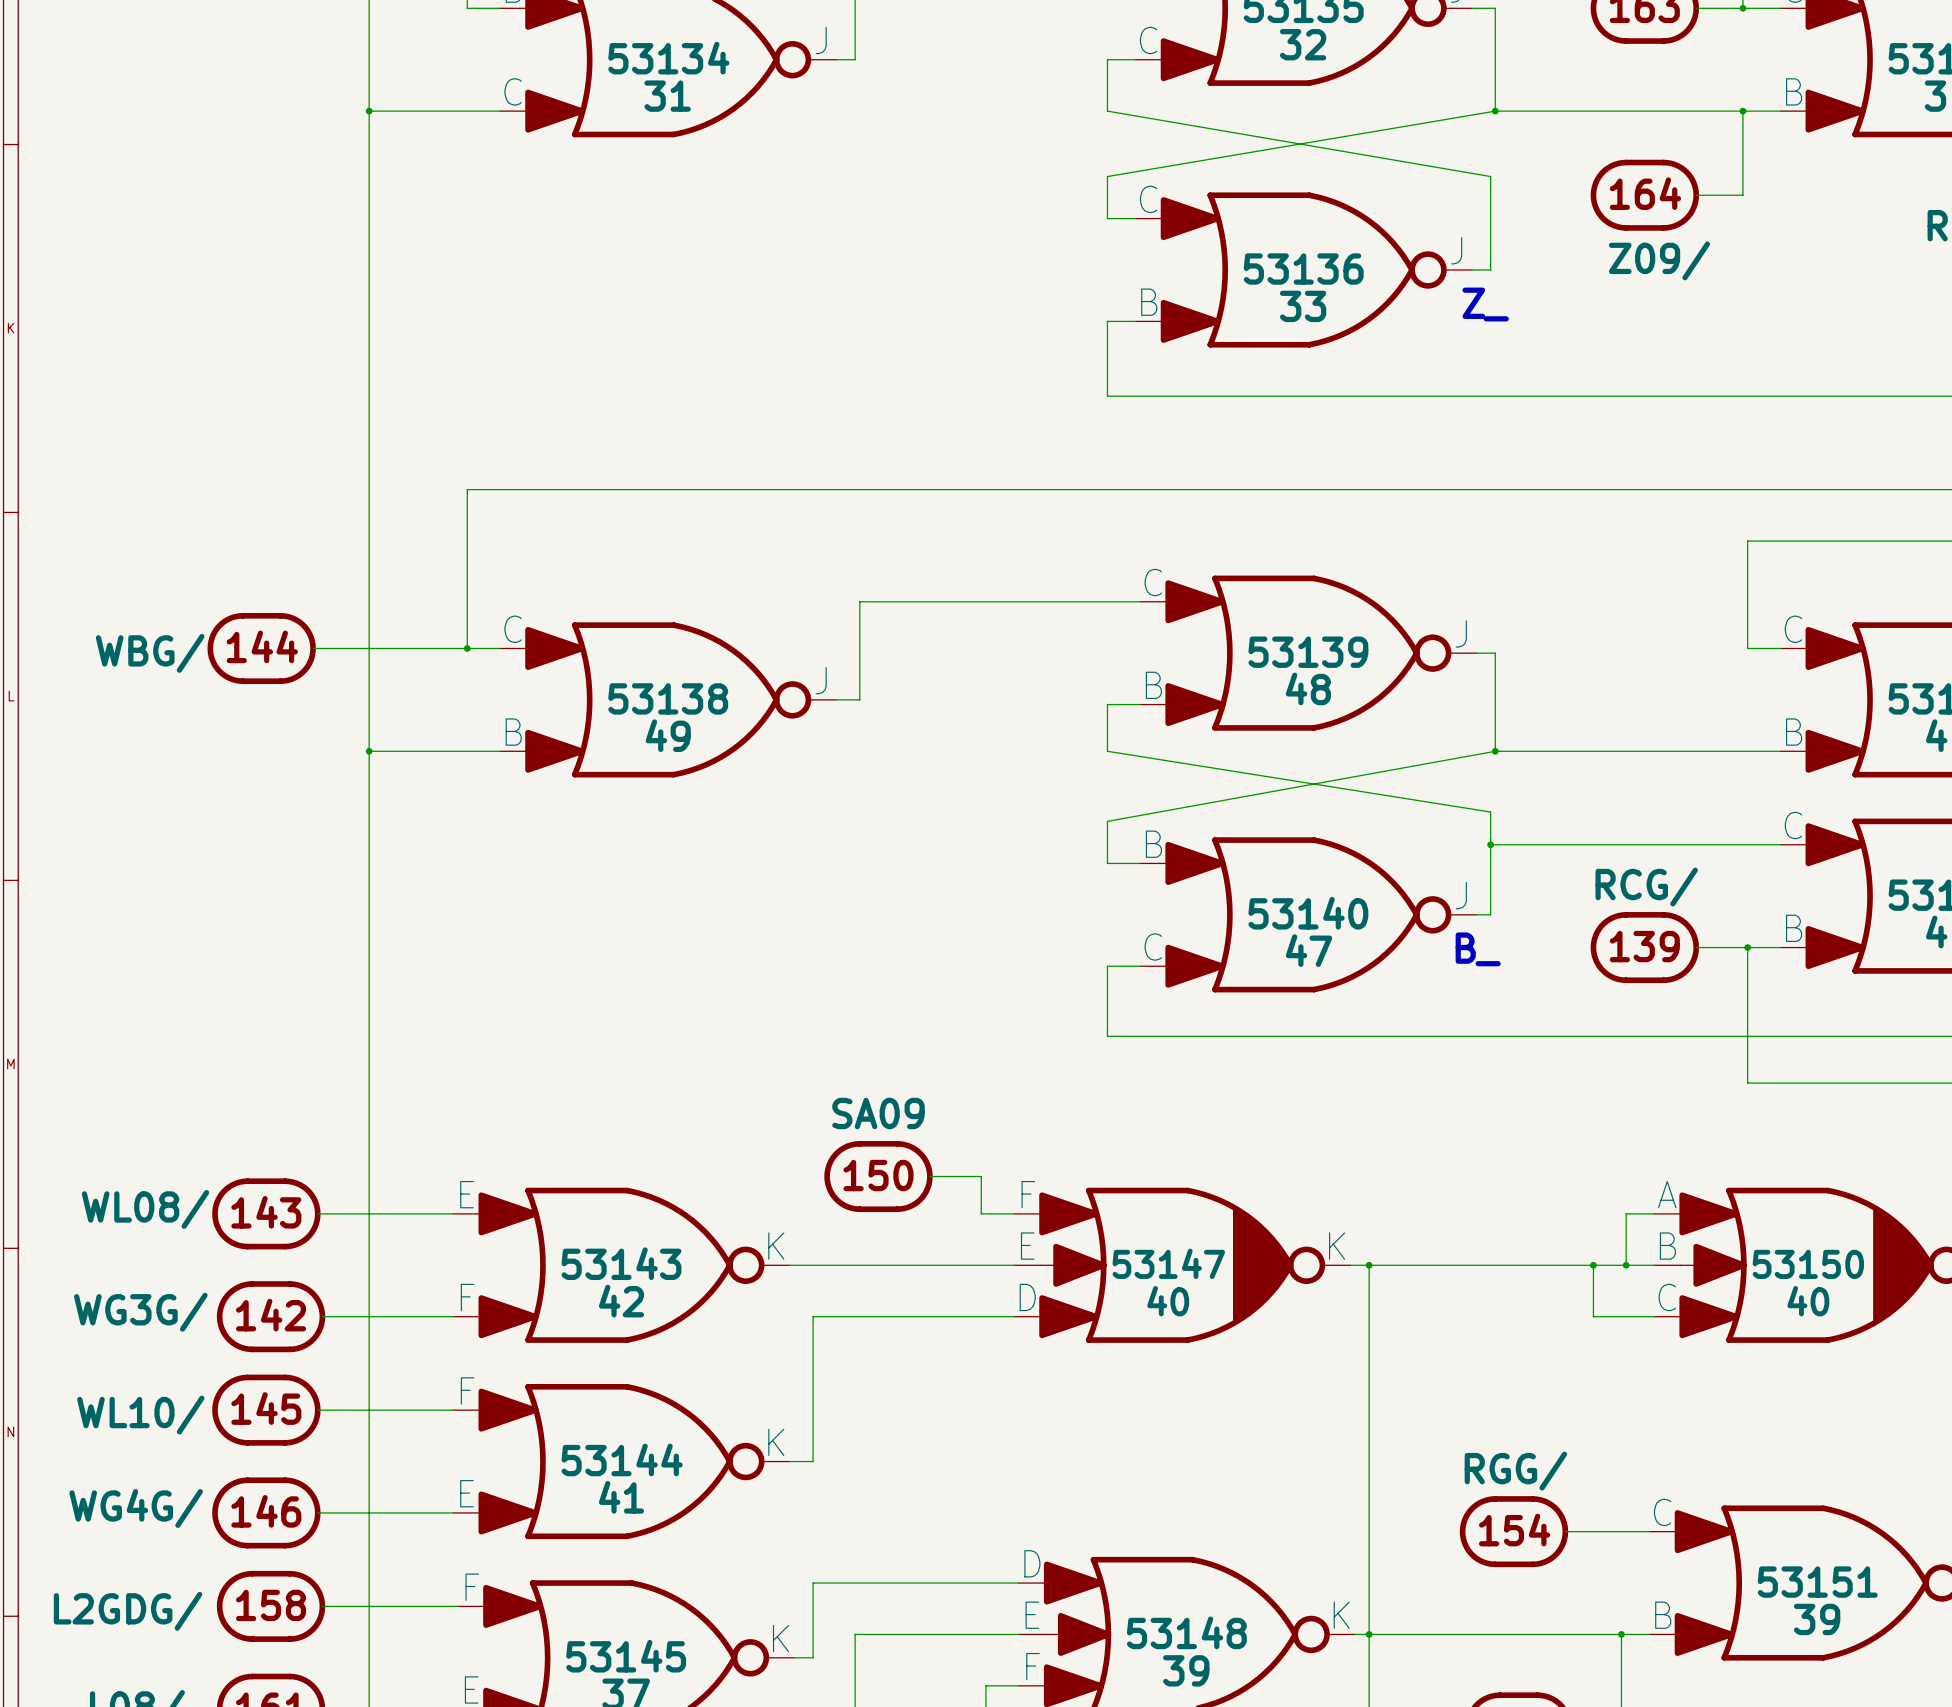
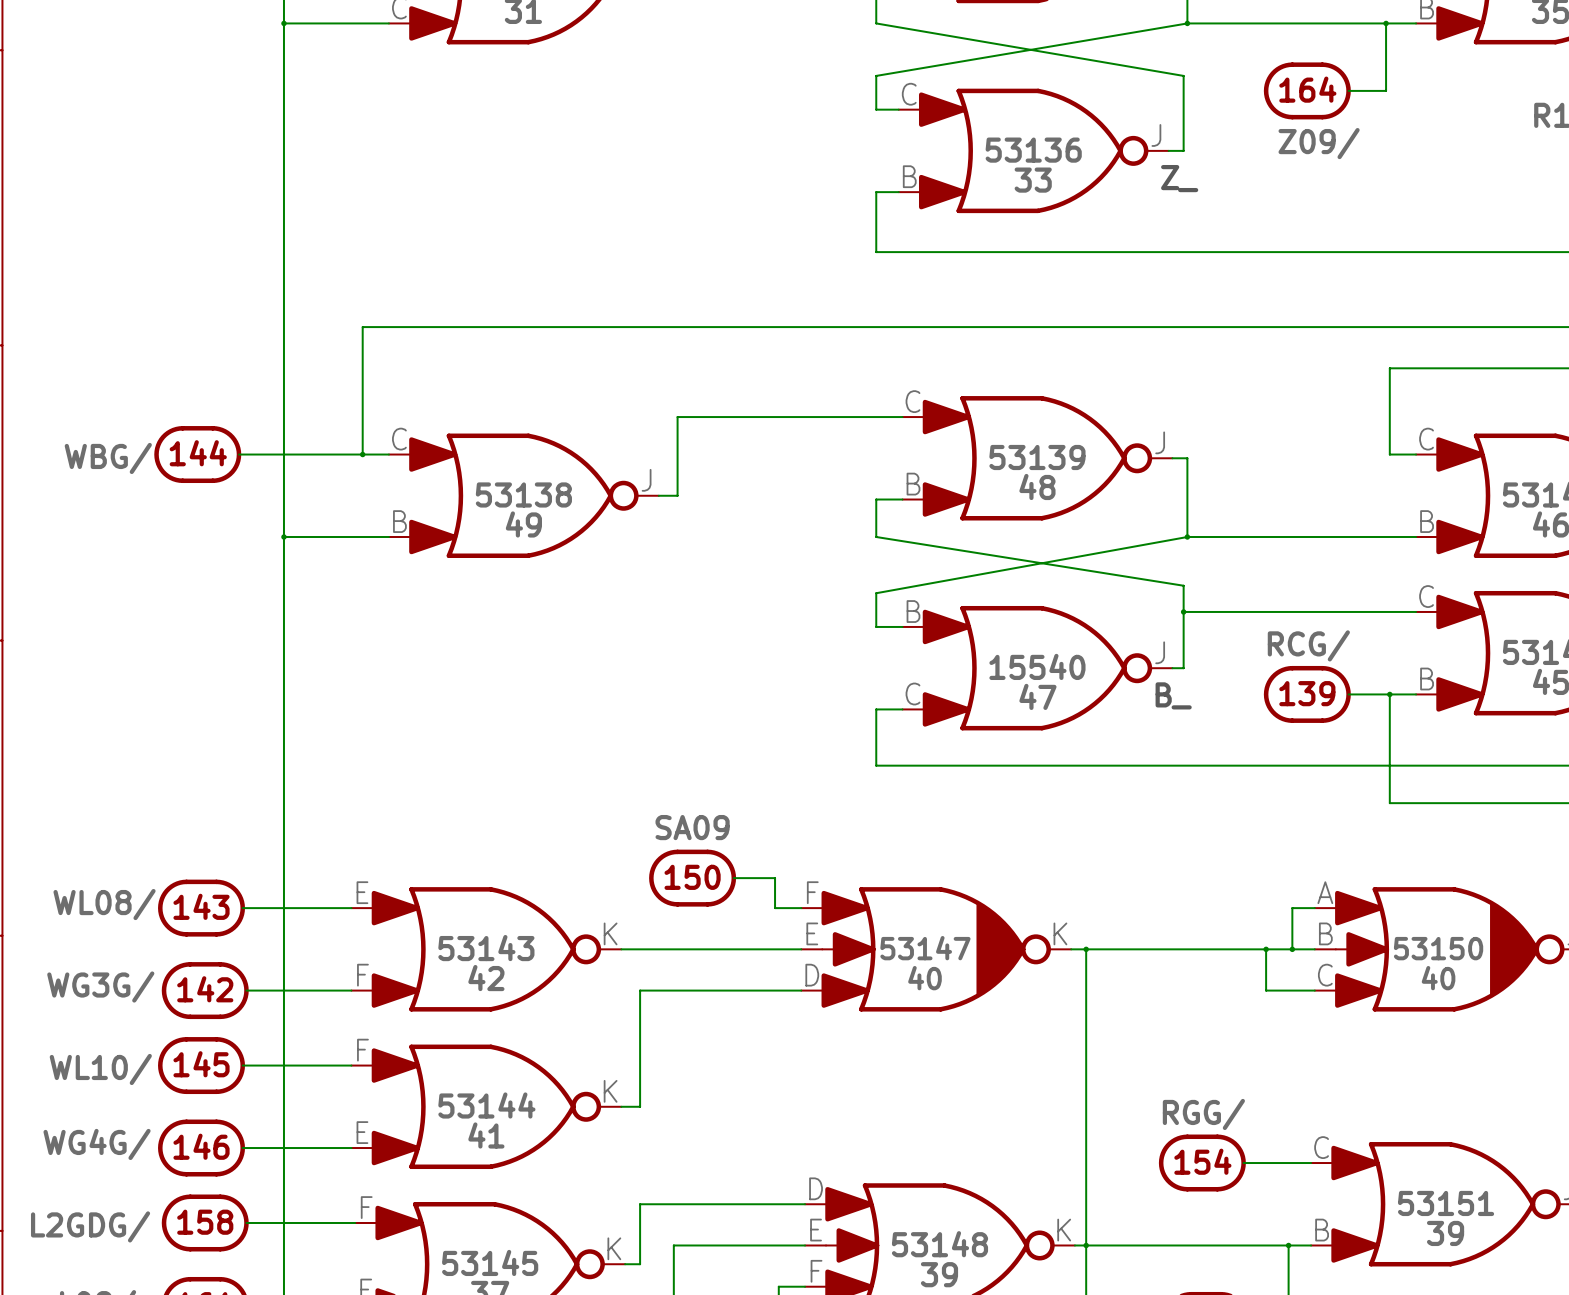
part text: 53140 (1308, 913) -> 15540 (1037, 666)

